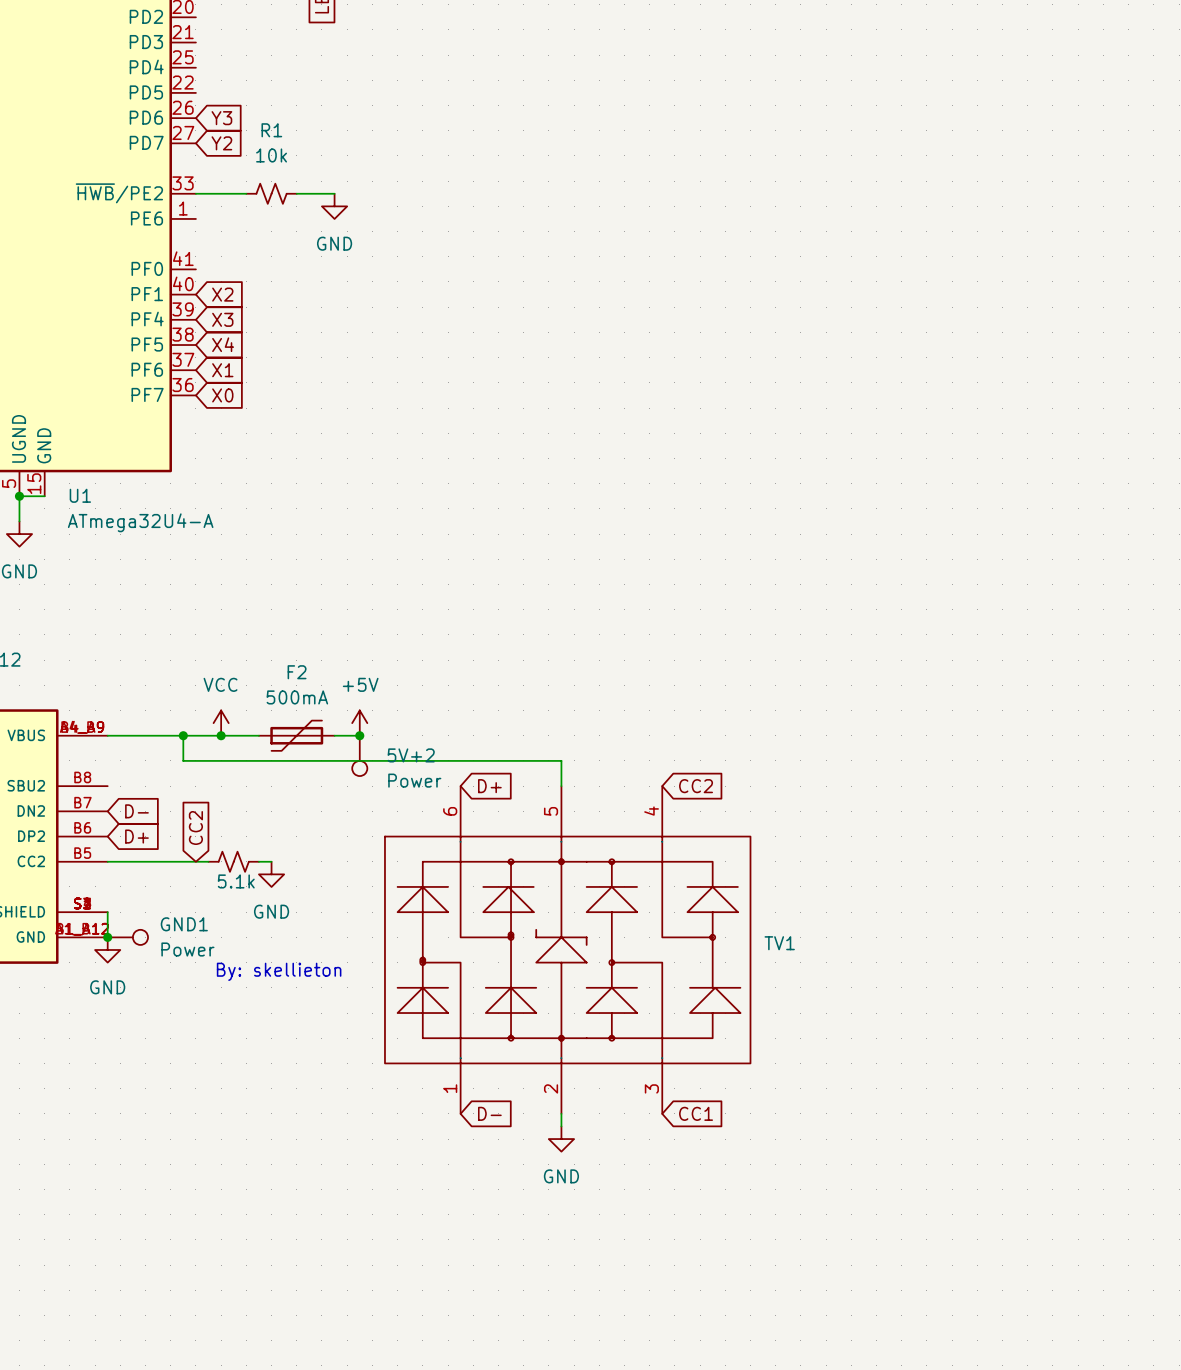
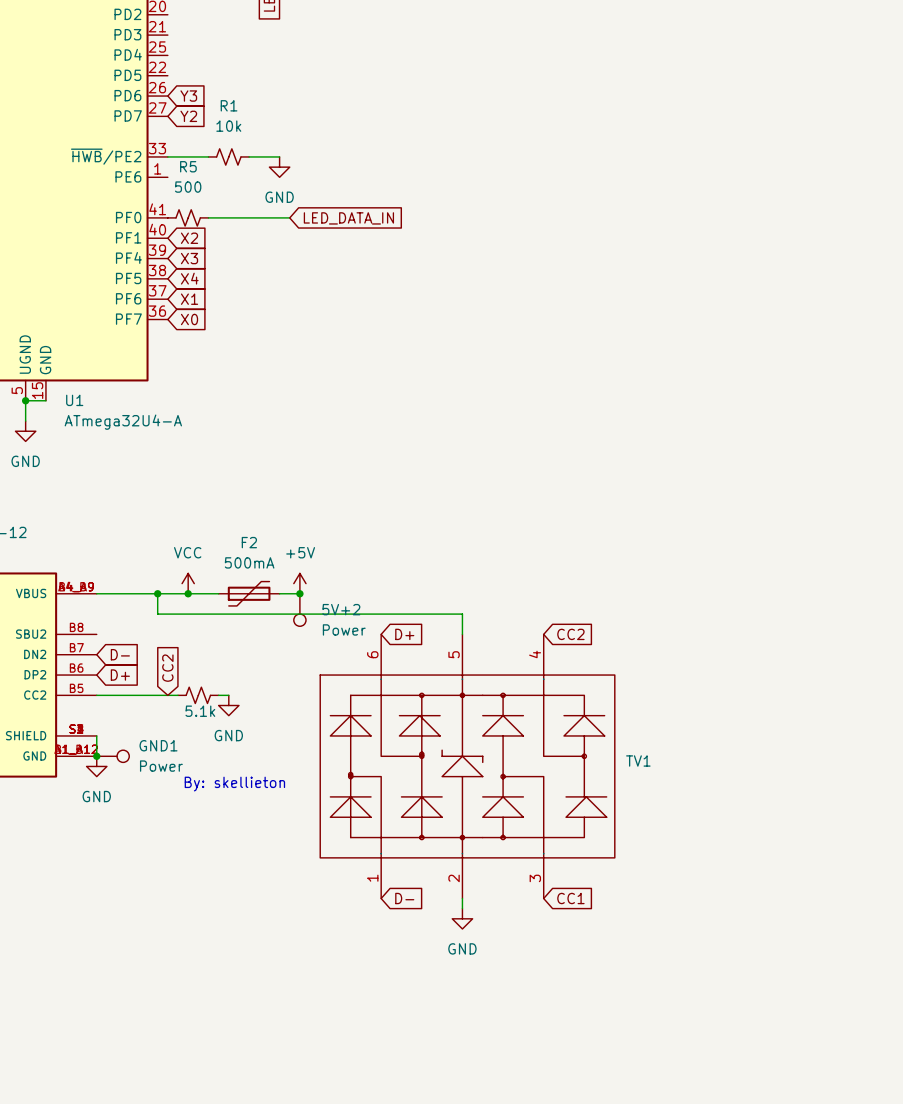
R5: none -> 500 (188, 217)
wire: none -> (208, 217) (289, 217)
global label: none -> LED_DATA_IN (348, 218)

